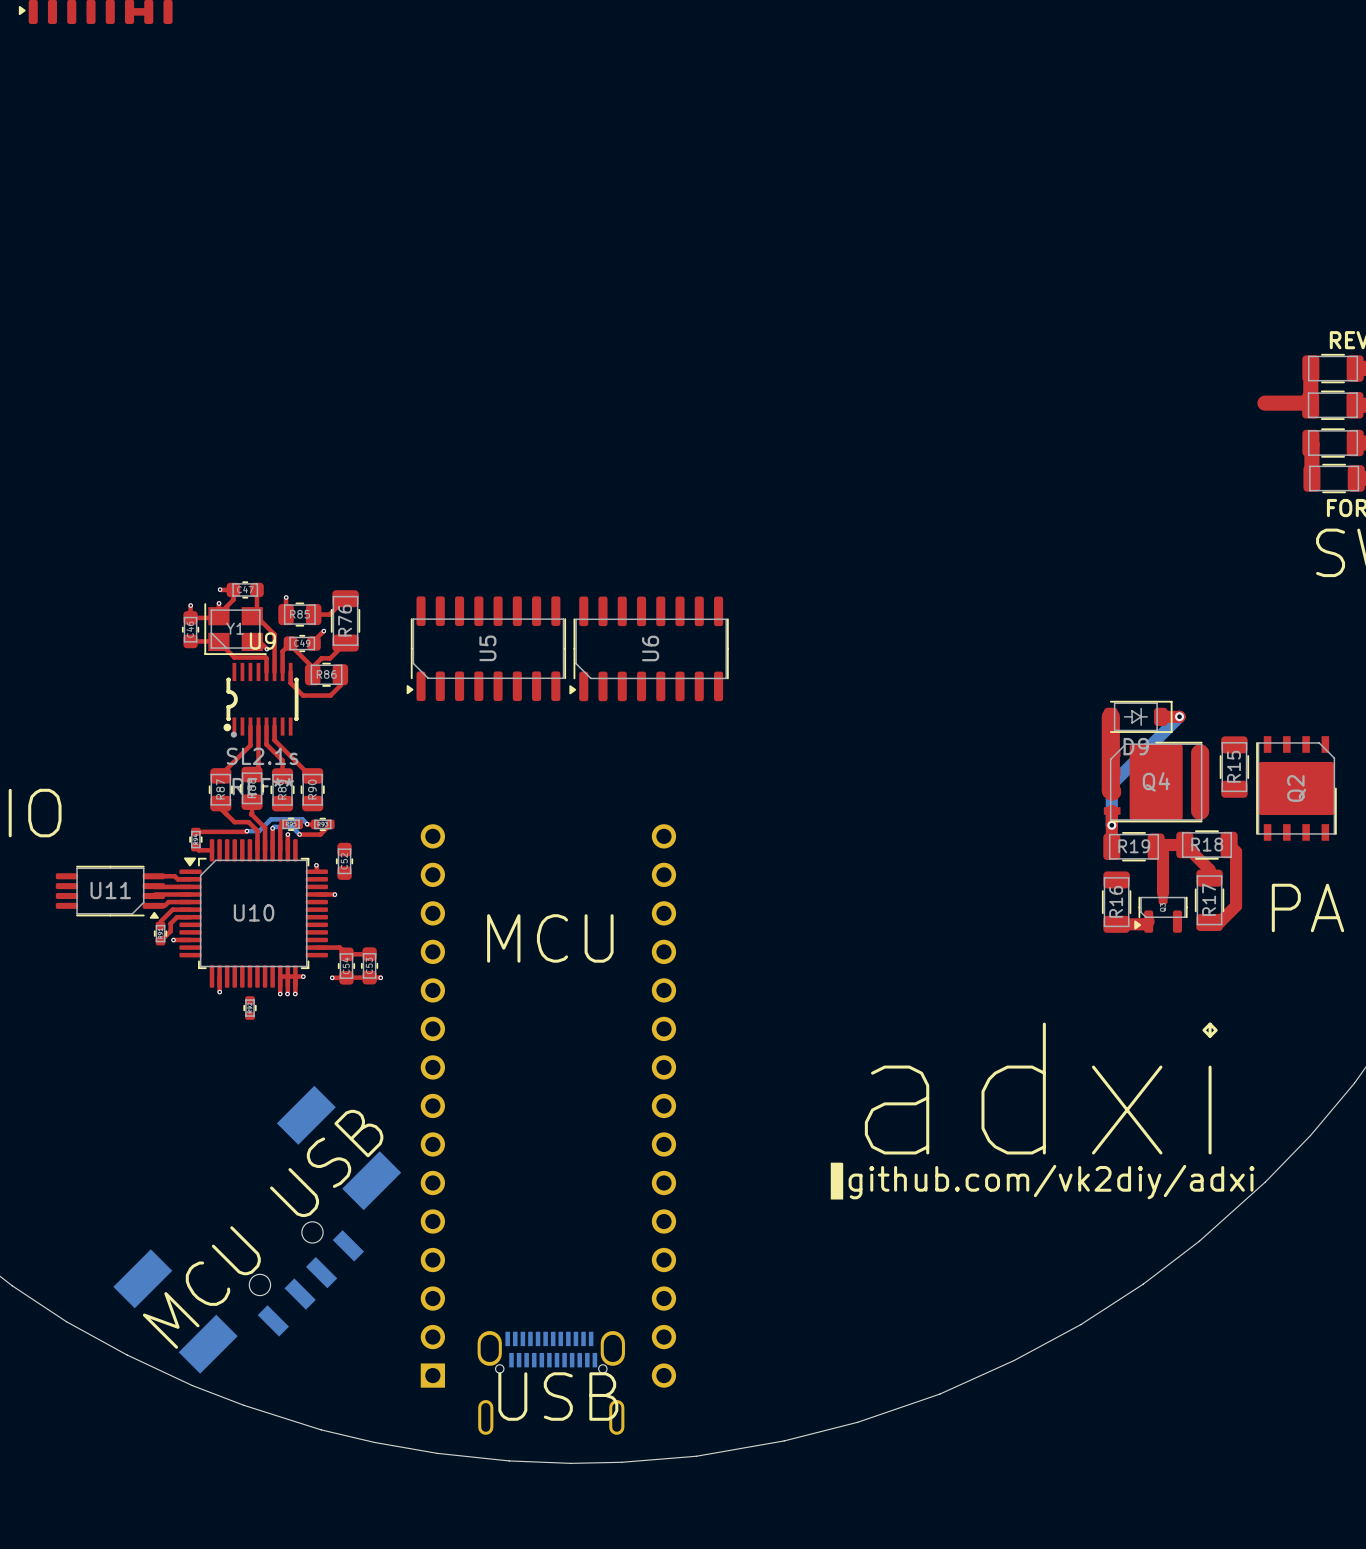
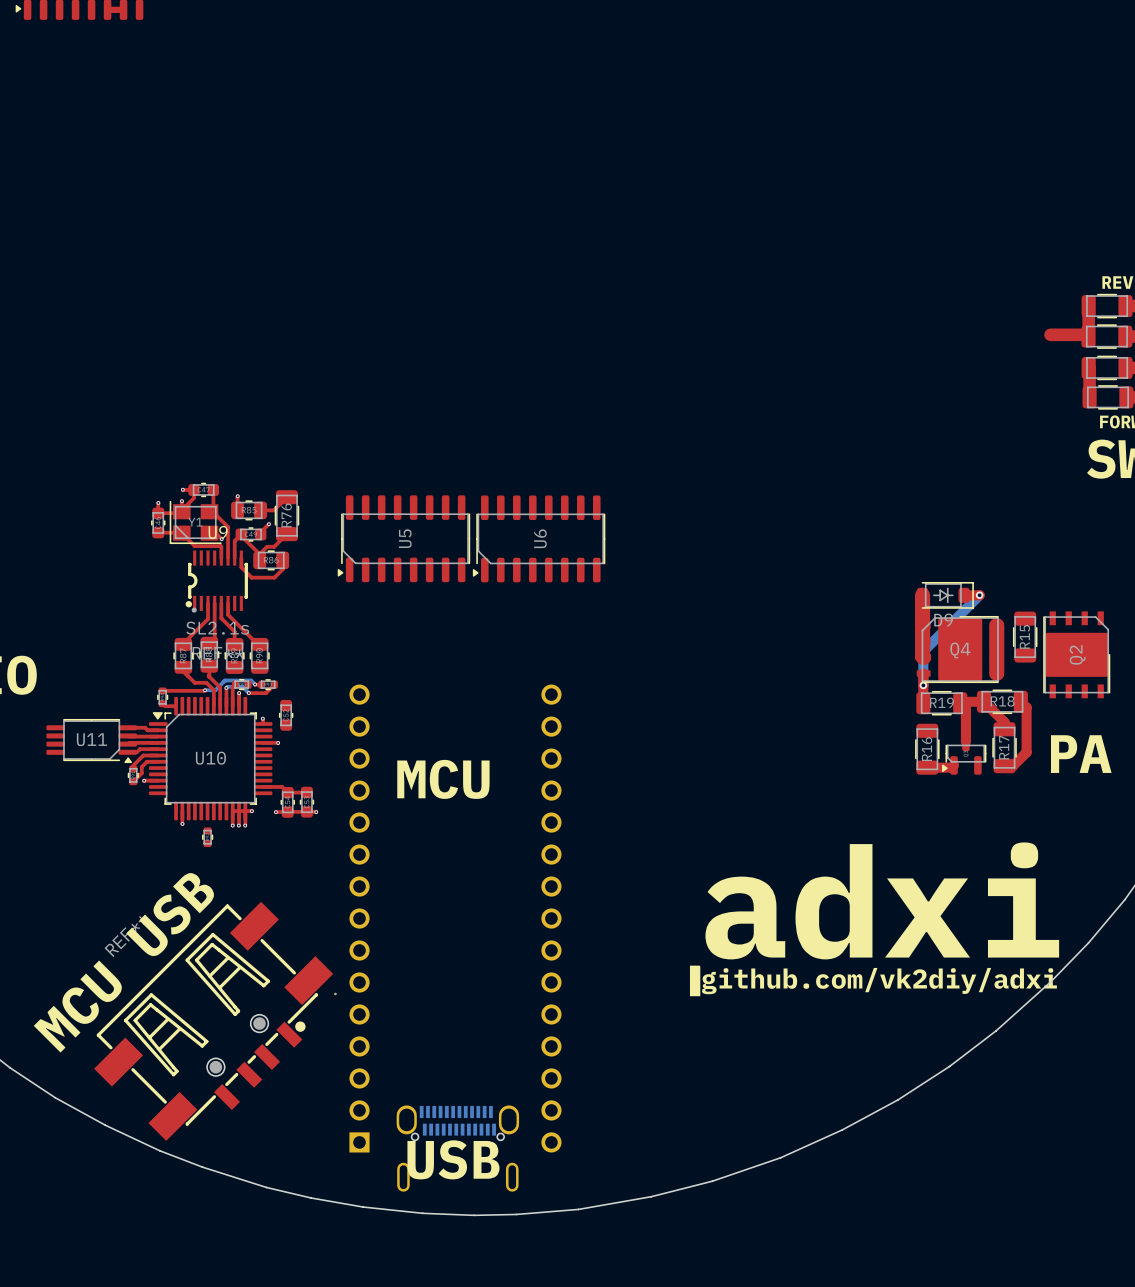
part side: bottom (257, 1229) -> top (215, 1021)
text position: MCU USB (263, 1229) -> MCU USB (123, 962)

